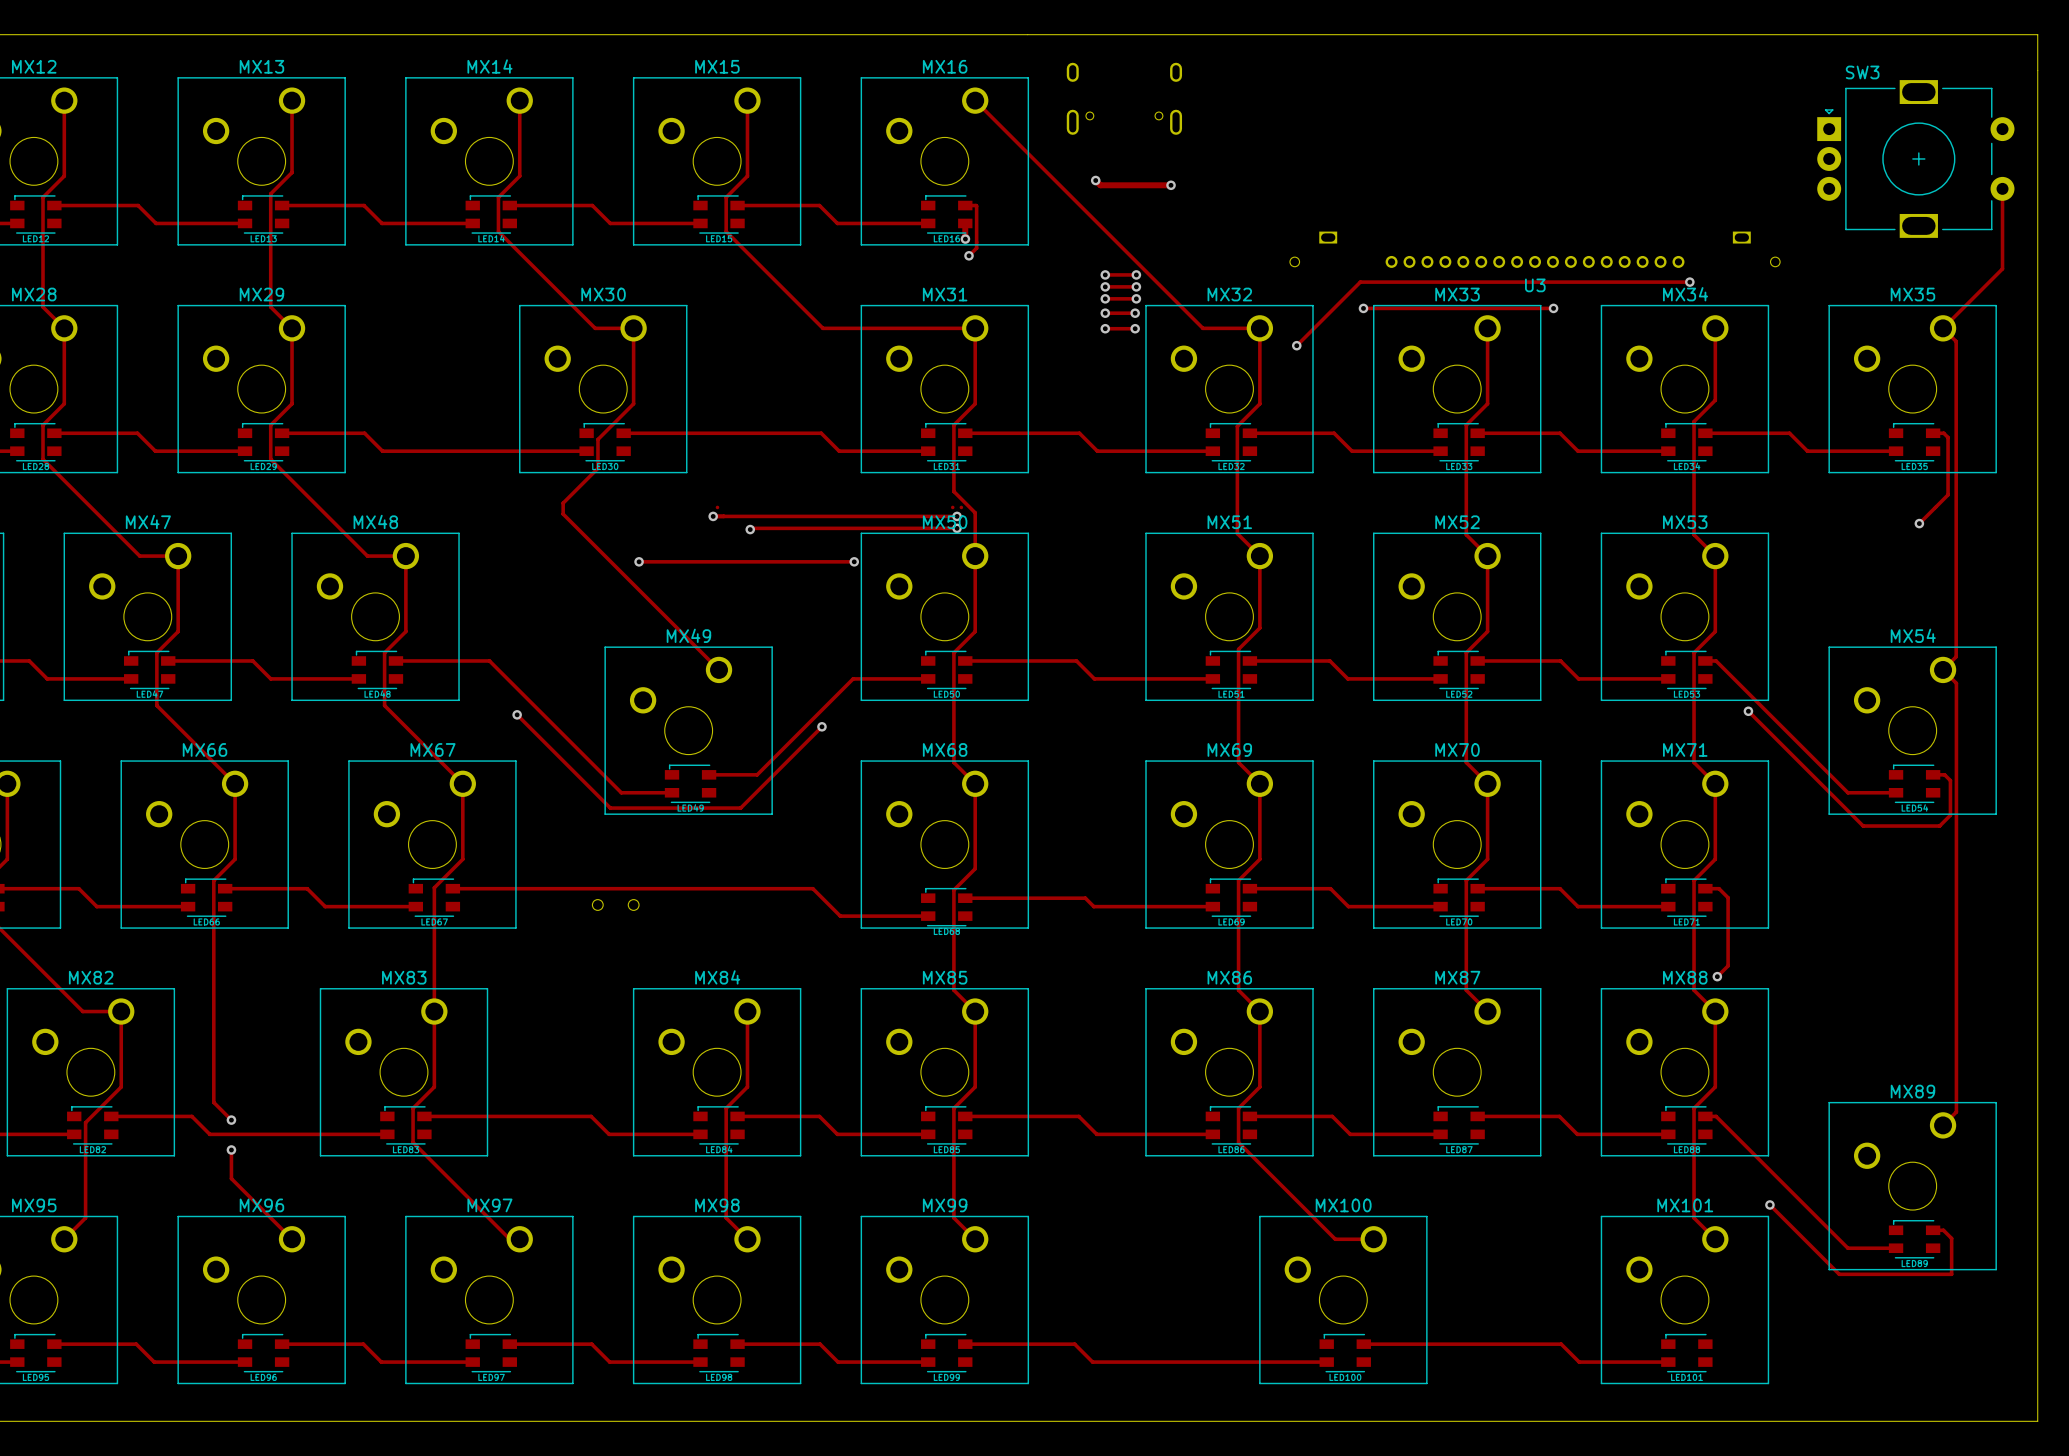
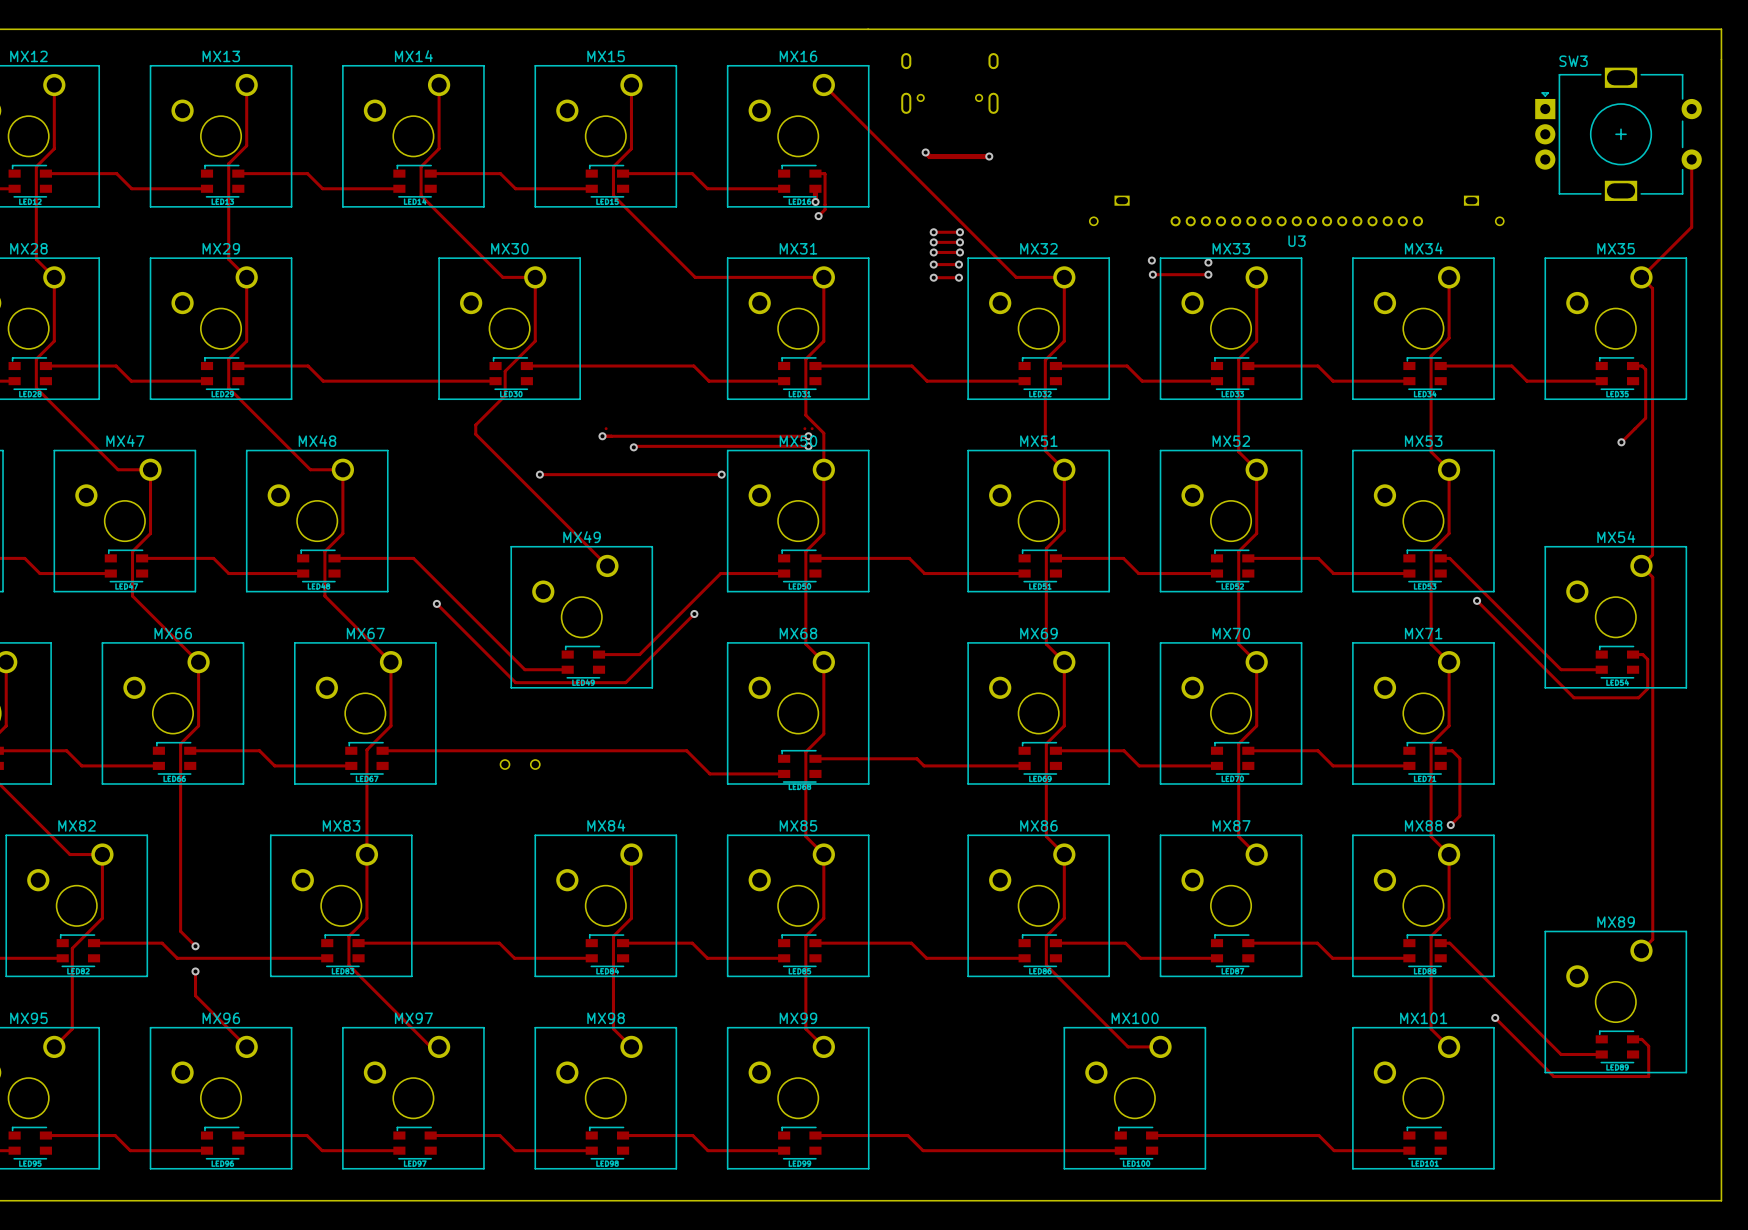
track: (1689, 282) (1360, 282) (1296, 345) -> none
via: (1689, 282) -> none
track: (1363, 308) (1553, 308) -> none
via: (1553, 308) -> none
via: none -> (1208, 262)
track: none -> (1152, 274) (1208, 274)
via: none -> (1152, 274)
via: none -> (1208, 274)
via: (1296, 345) -> none

